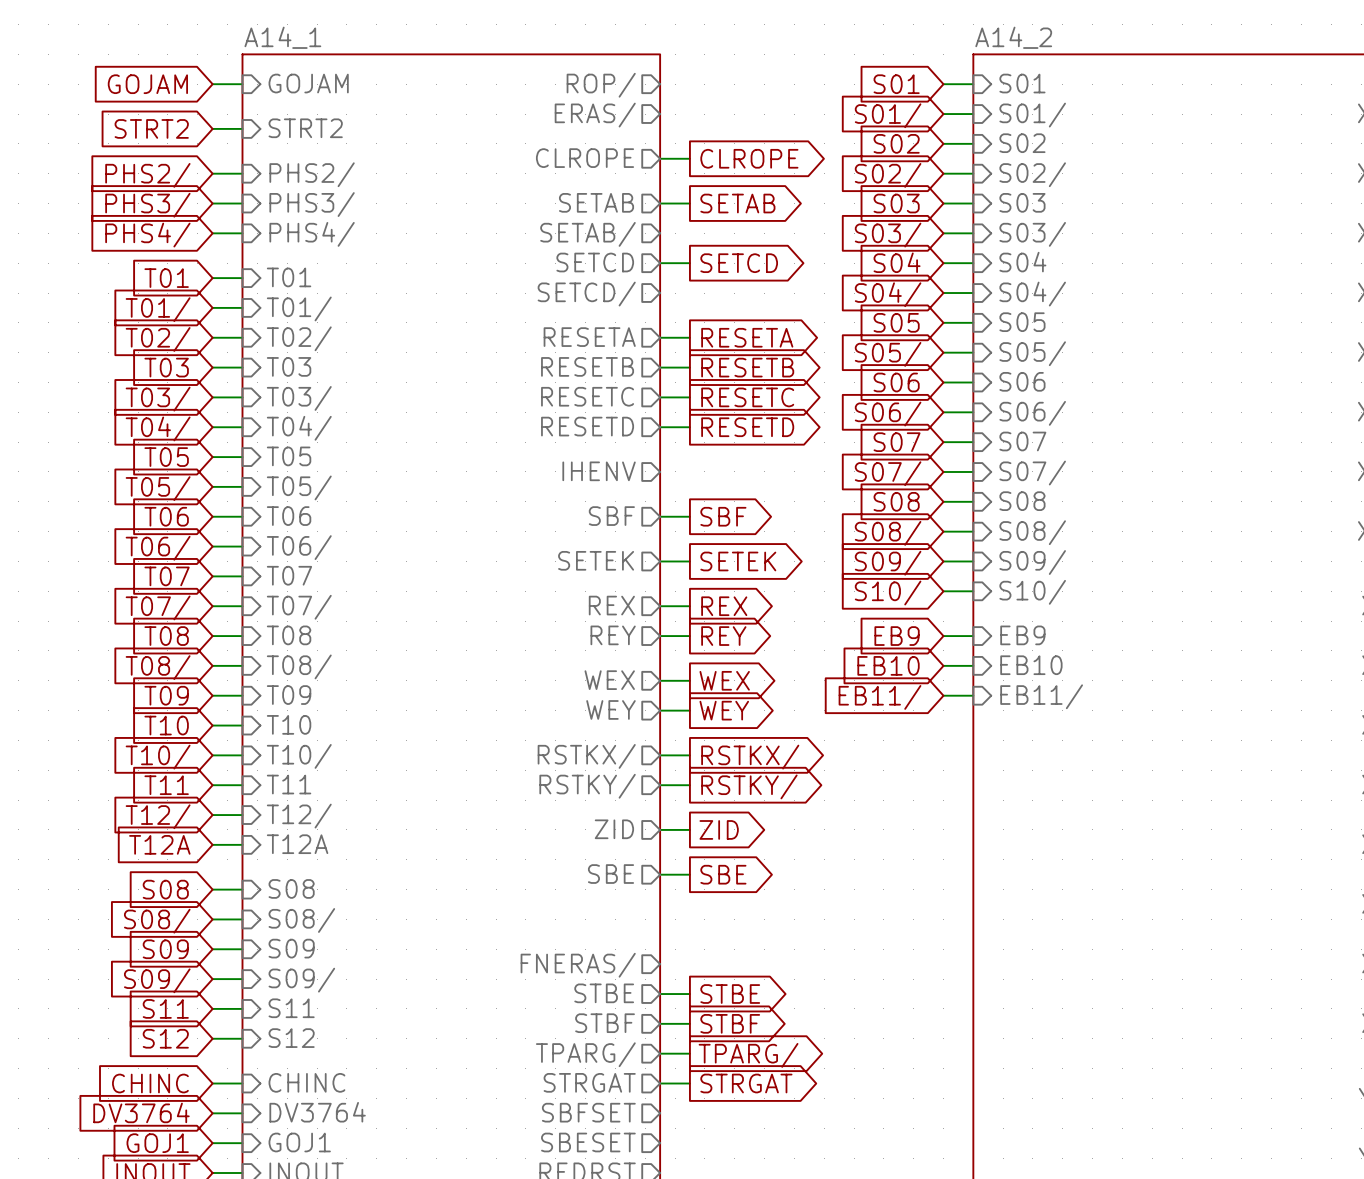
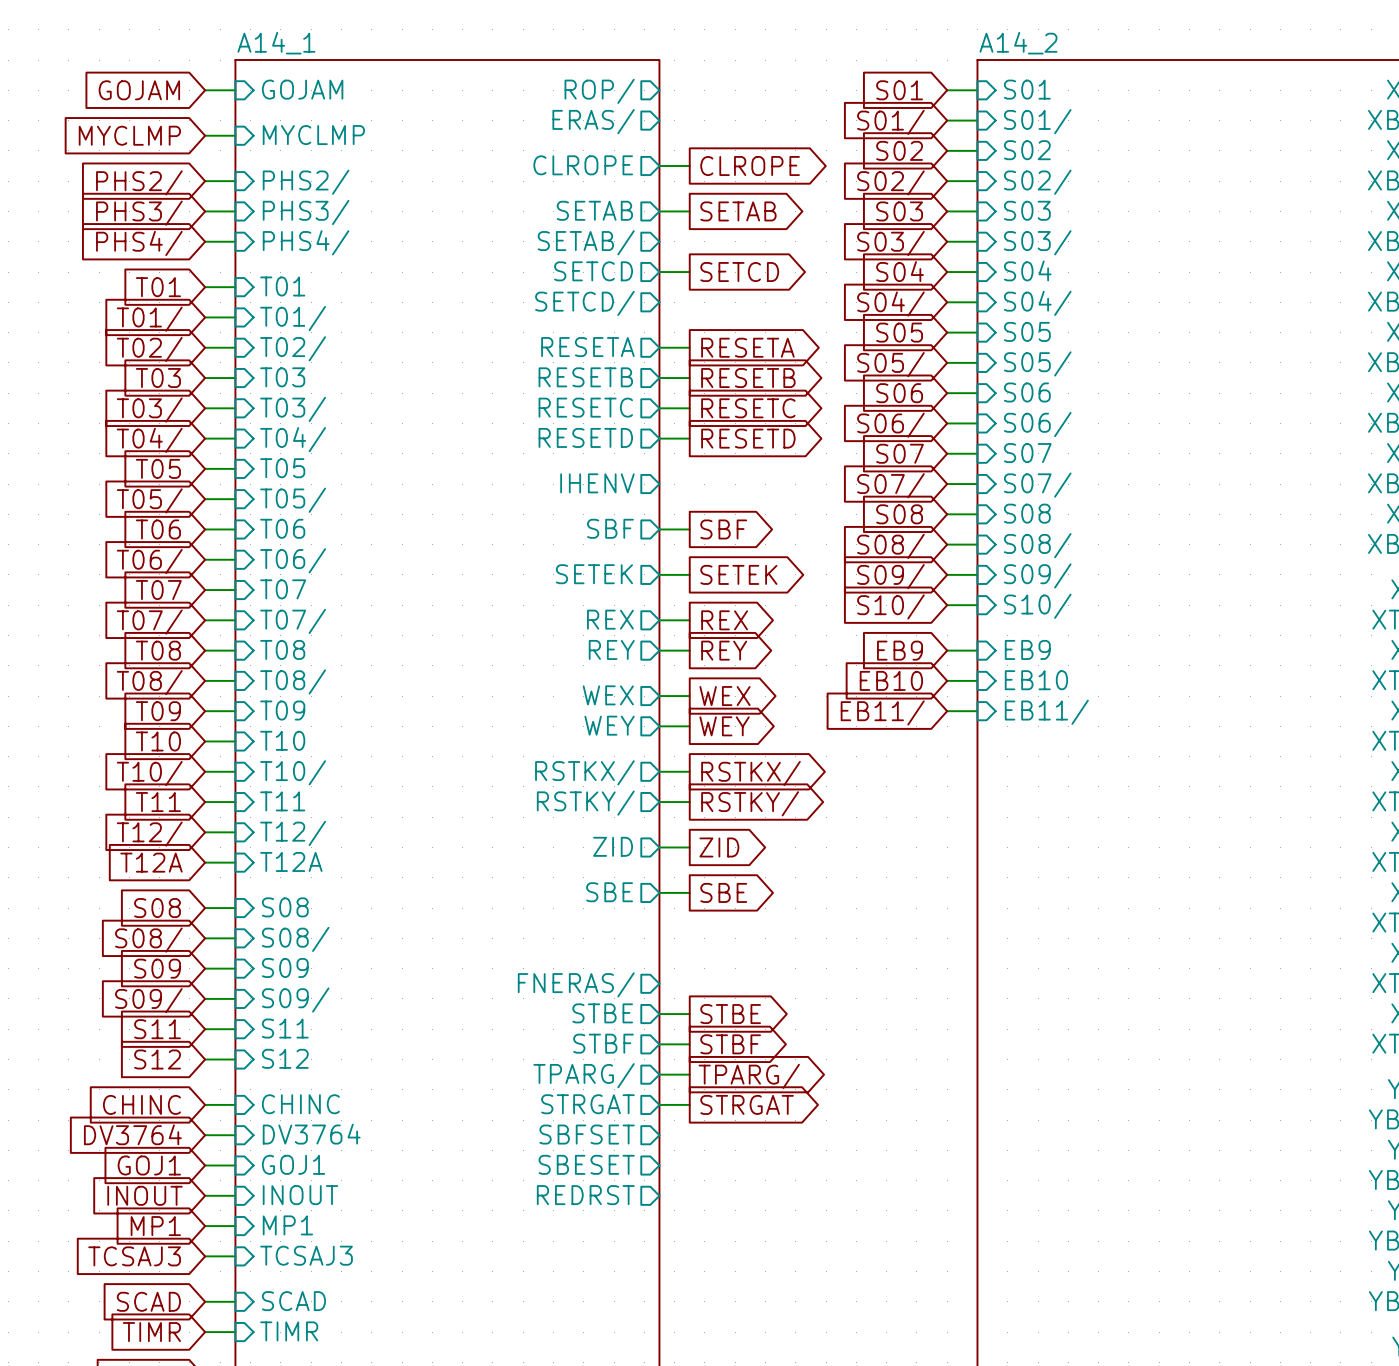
global label: STRT2 (151, 128) -> MYCLMP (129, 135)
sheet pin: STRT2 (305, 128) -> MYCLMP (313, 135)

